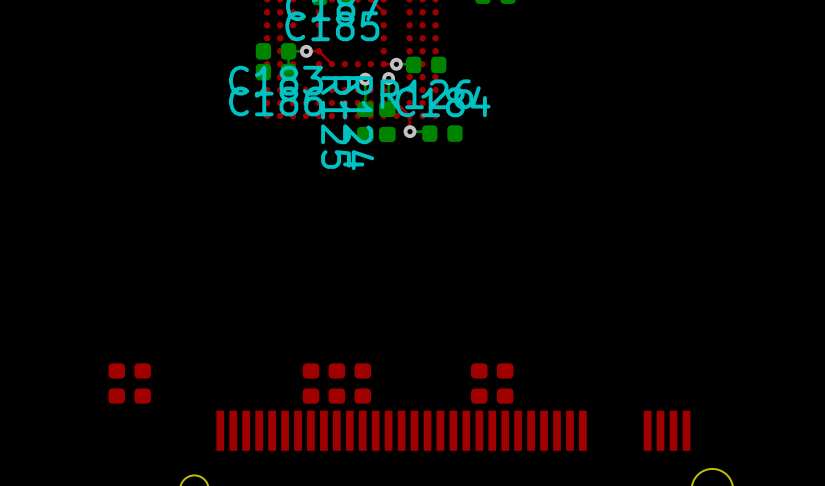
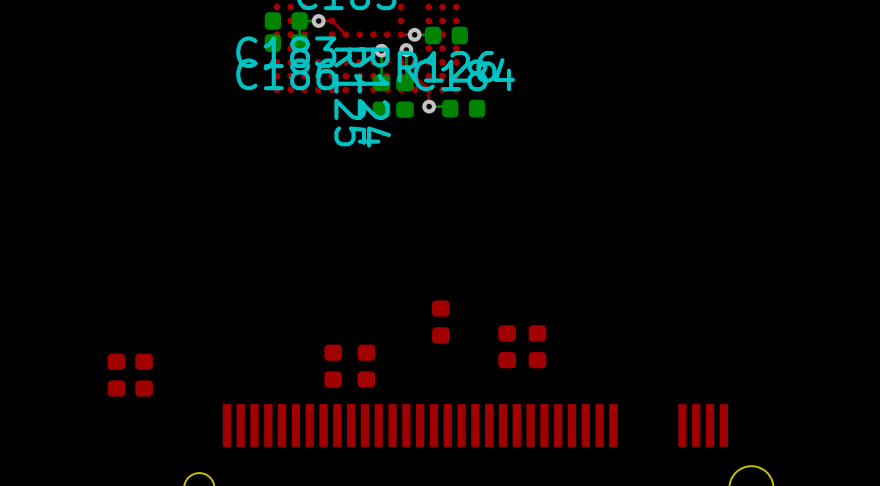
part: none -> (440, 321)
part: none -> (507, 346)
part: none -> (537, 346)
part: none -> (333, 366)
part: none -> (366, 366)
part: (310, 383) -> none
part: (336, 383) -> none
part: (362, 383) -> none
part: (479, 383) -> none
part: (505, 383) -> none

